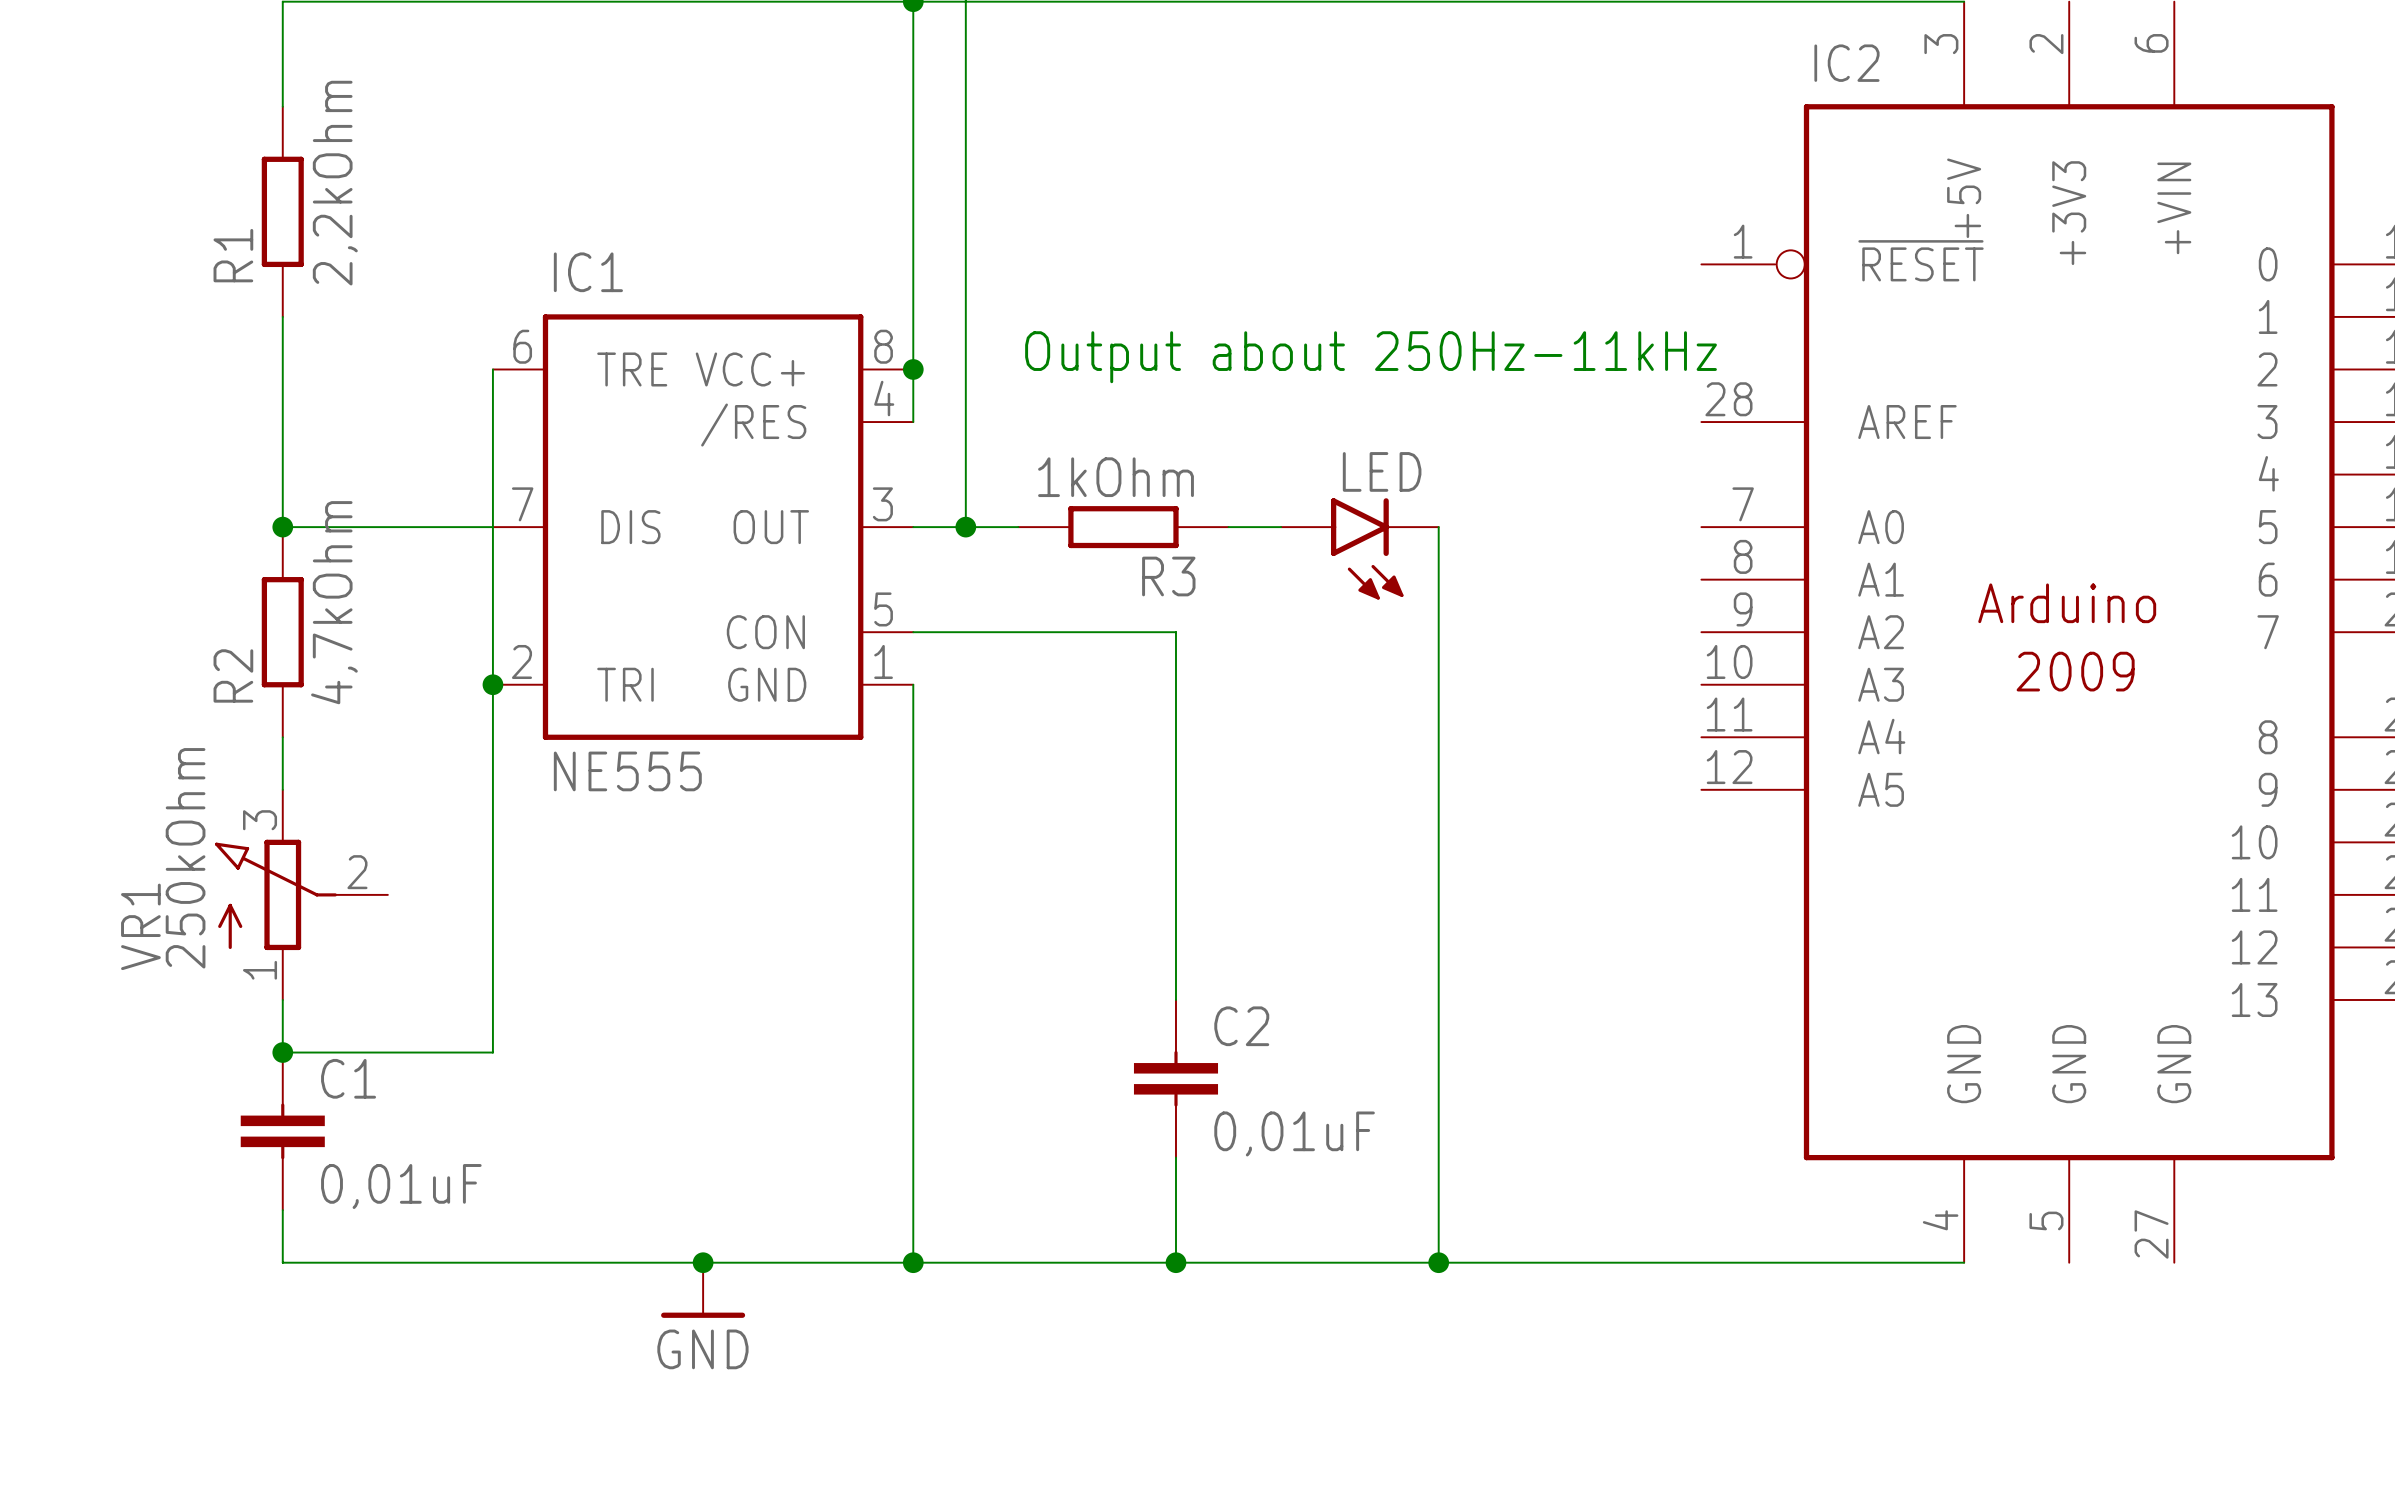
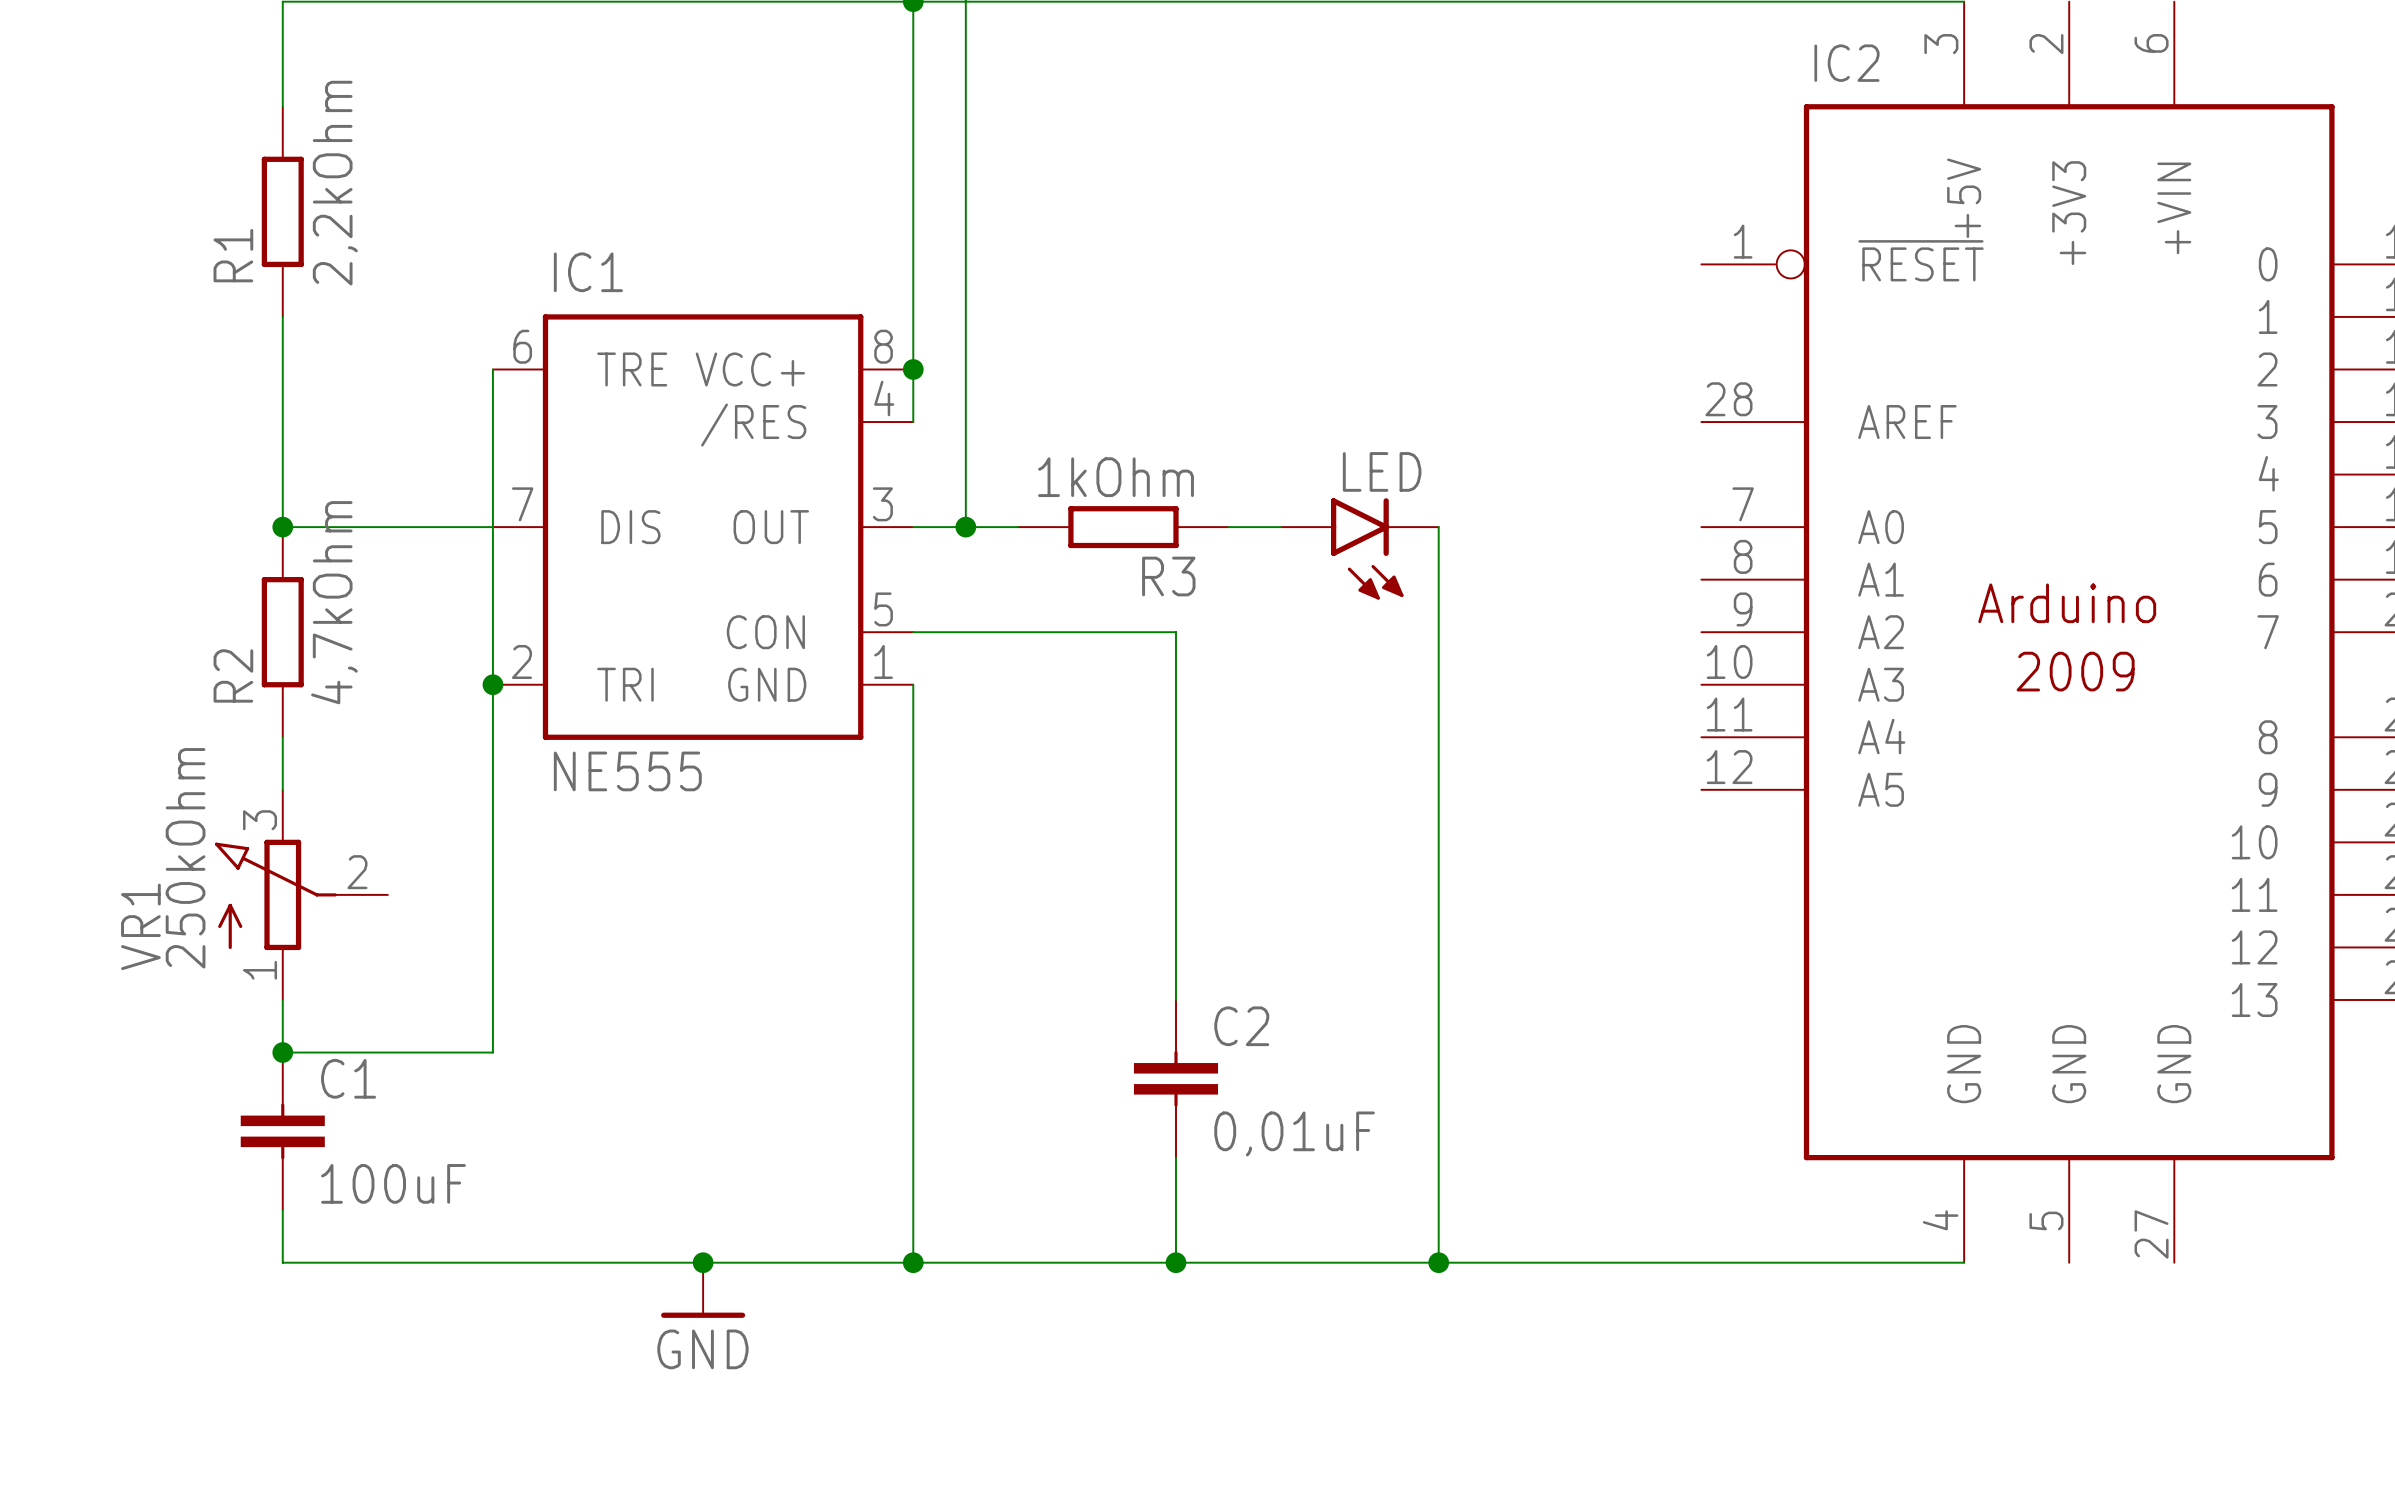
text: Output about 250Hz-11kHz (1371, 357) -> none
C1 value: 0,01uF (401, 1186) -> 100uF (393, 1183)

